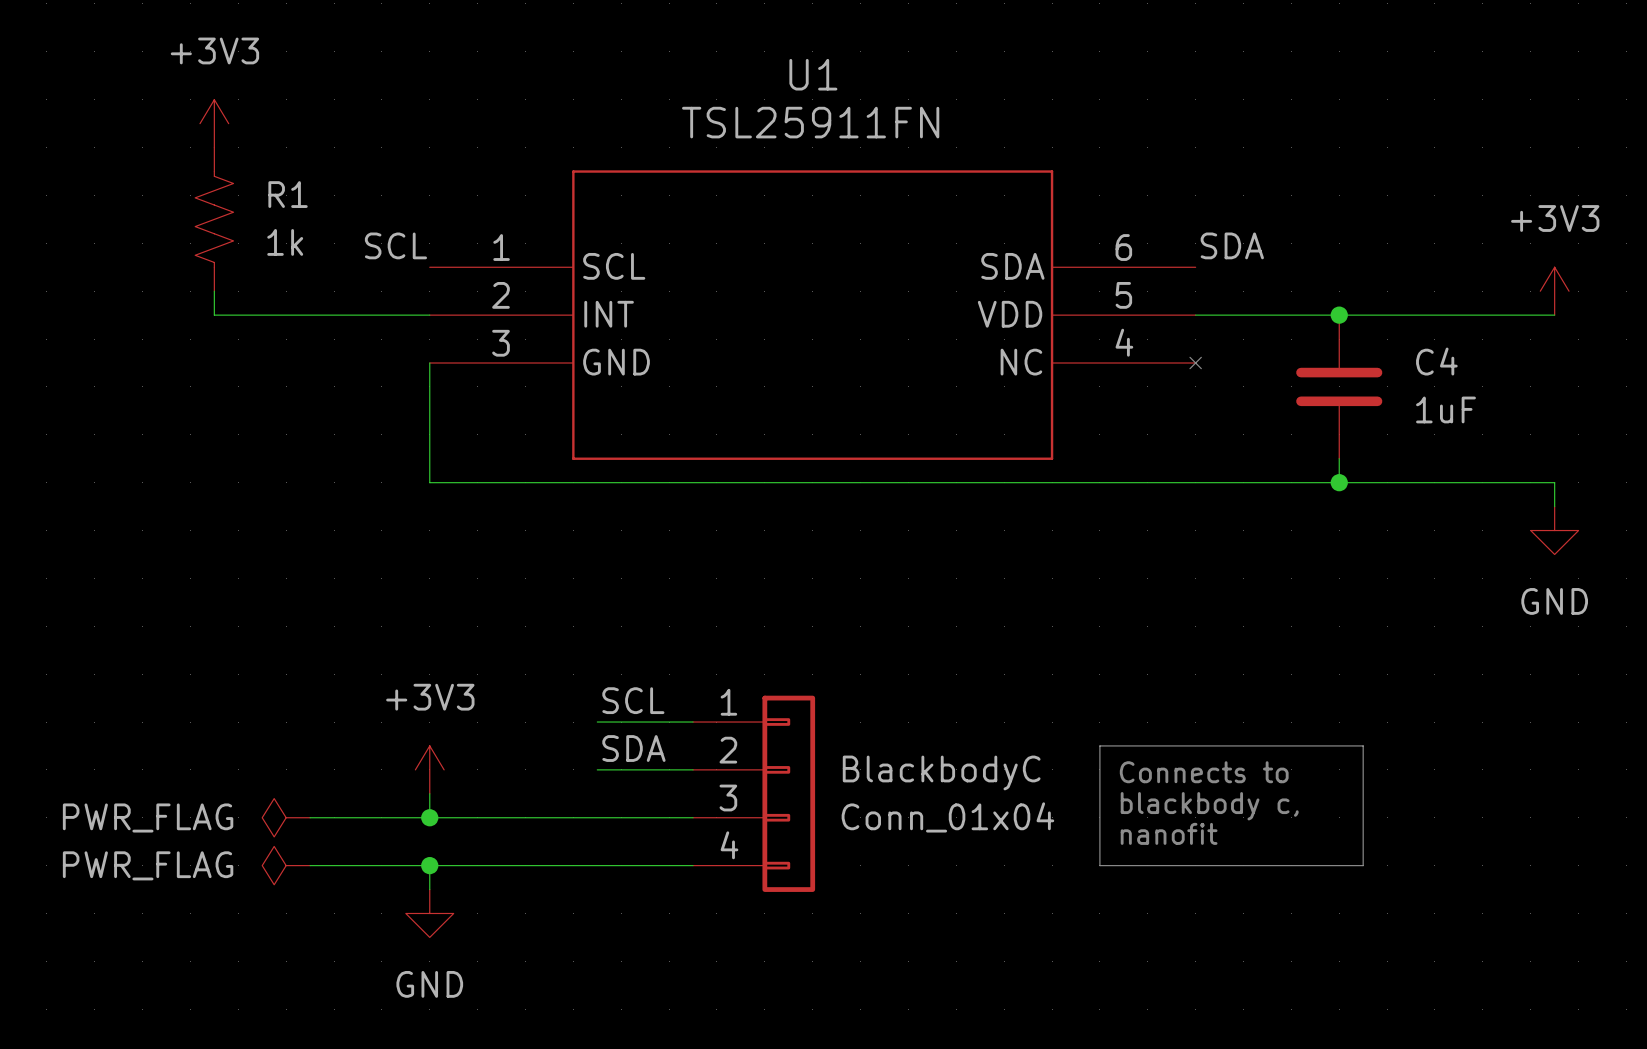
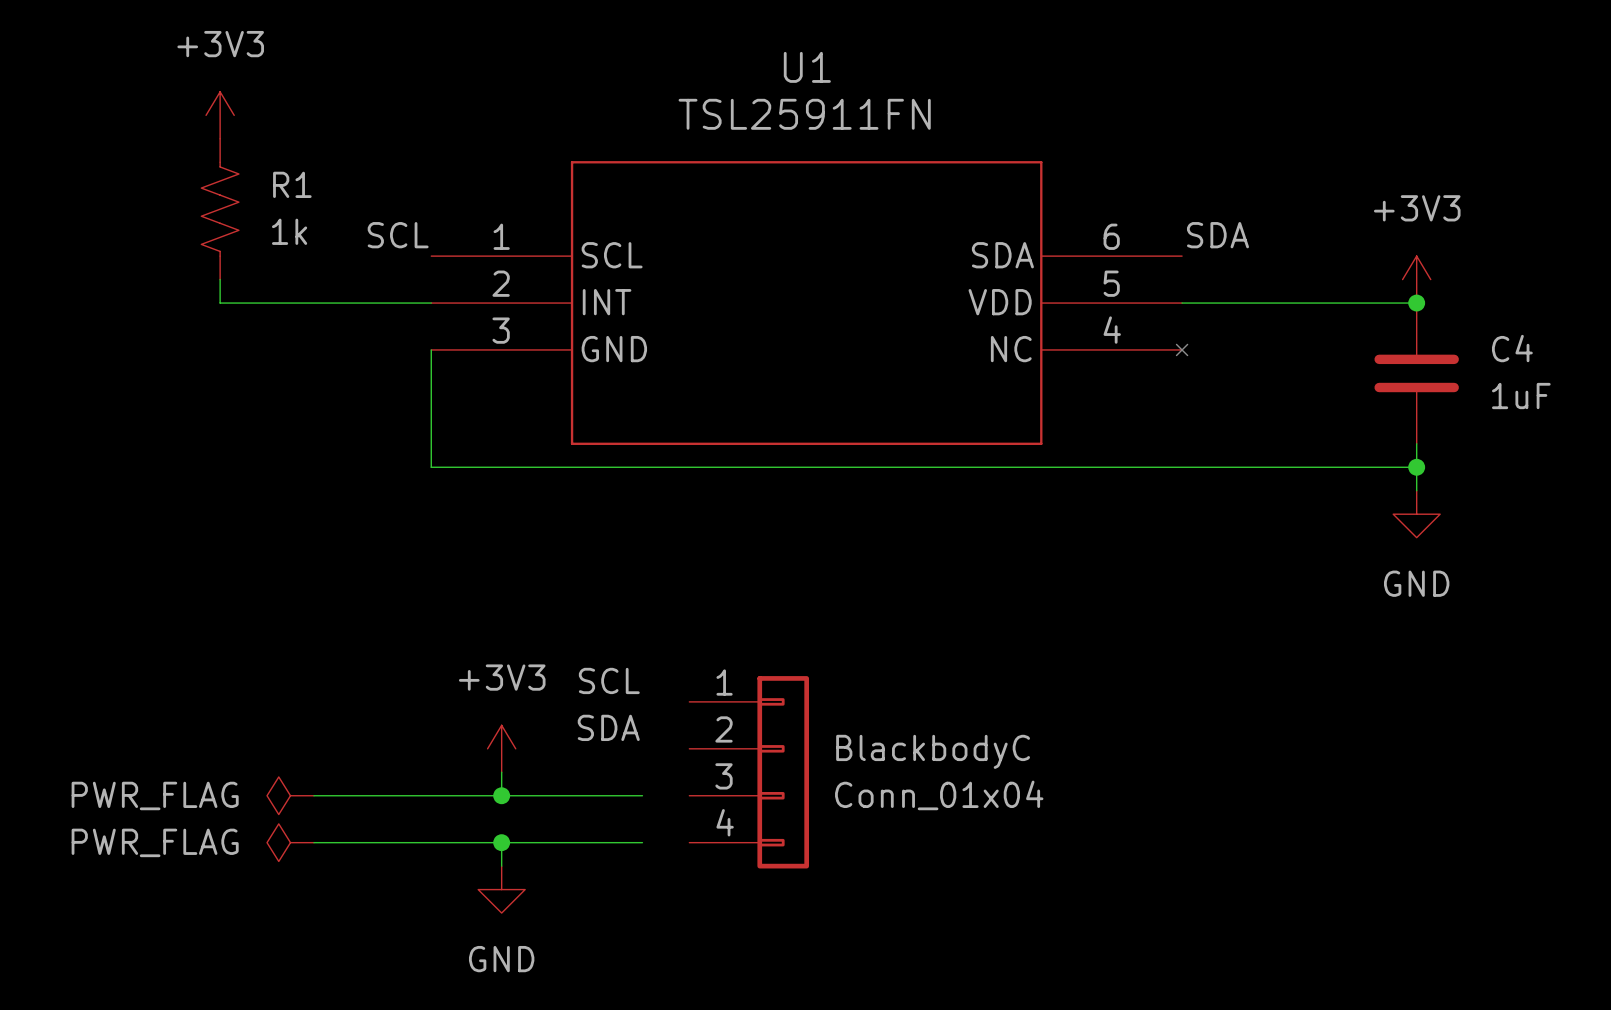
power symbol position: +3V3 (1554, 291) -> +3V3 (1416, 279)
junction position: (1339, 315) -> (1416, 303)
wire: (1434, 315) (1554, 315) -> none
C4 position: (1339, 386) -> (1416, 373)
wire: (1339, 458) (1339, 482) -> none
wire: none -> (1416, 443) (1416, 490)
junction position: (1339, 482) -> (1416, 467)
wire: (1434, 482) (1554, 482) (1554, 506) -> none
power symbol position: GND (1554, 530) -> GND (1416, 514)
label position: SCL (633, 700) -> SCL (609, 680)
wire: (597, 722) (693, 722) -> none
line: (1099, 745) (1363, 745) (1363, 865) (1099, 865) (1099, 745) -> none
label position: SDA (633, 748) -> SDA (608, 727)
power symbol position: +3V3 (429, 769) -> +3V3 (501, 748)
wire: (597, 769) (693, 769) -> none
text: Connects to (1204, 772) -> none
wire: (429, 793) (429, 817) -> (501, 772) (501, 795)
text: blackbody c, (1209, 806) -> none
junction: (429, 817) -> none
junction: none -> (501, 795)
wire: (645, 817) (693, 817) -> none
text: nanofit (1169, 833) -> none
wire: (429, 865) (429, 889) -> (501, 842) (501, 866)
junction: (429, 865) -> none
junction: none -> (501, 842)
wire: (645, 865) (693, 865) -> none
power symbol position: GND (429, 913) -> GND (501, 889)

